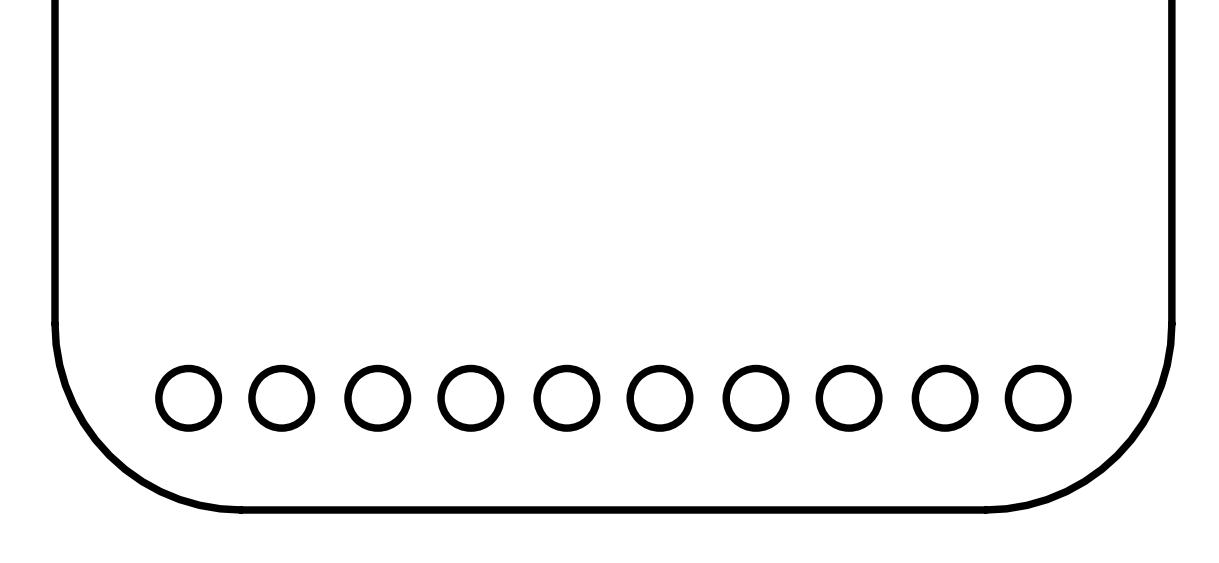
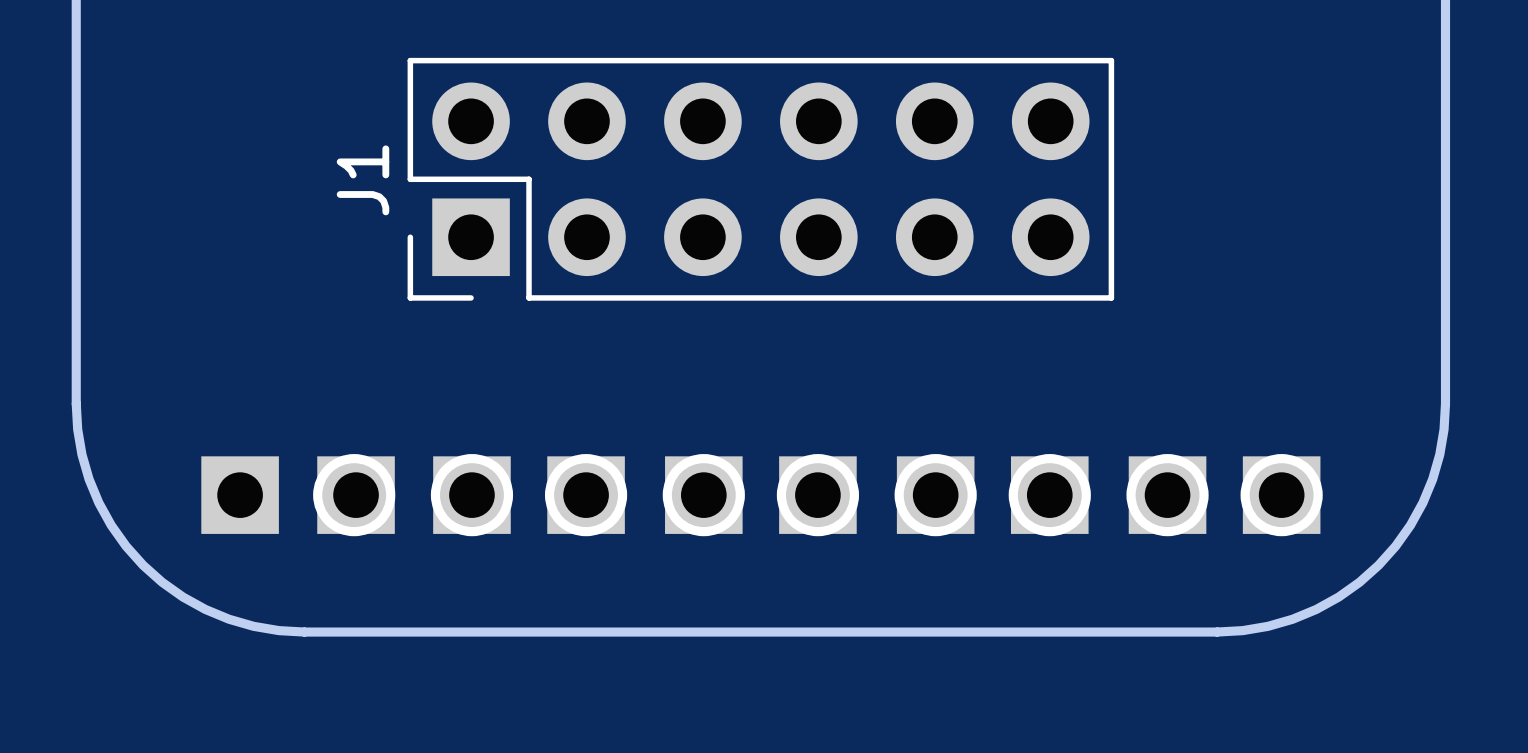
J1: none -> (760, 179)
drawing: [155, 364, 223, 432] -> none
part: none -> (240, 495)
part: none -> (356, 495)
part: none -> (471, 495)
part: none -> (586, 495)
part: none -> (703, 495)
part: none -> (817, 495)
part: none -> (935, 495)
part: none -> (1049, 495)
part: none -> (1167, 495)
part: none -> (1281, 495)

